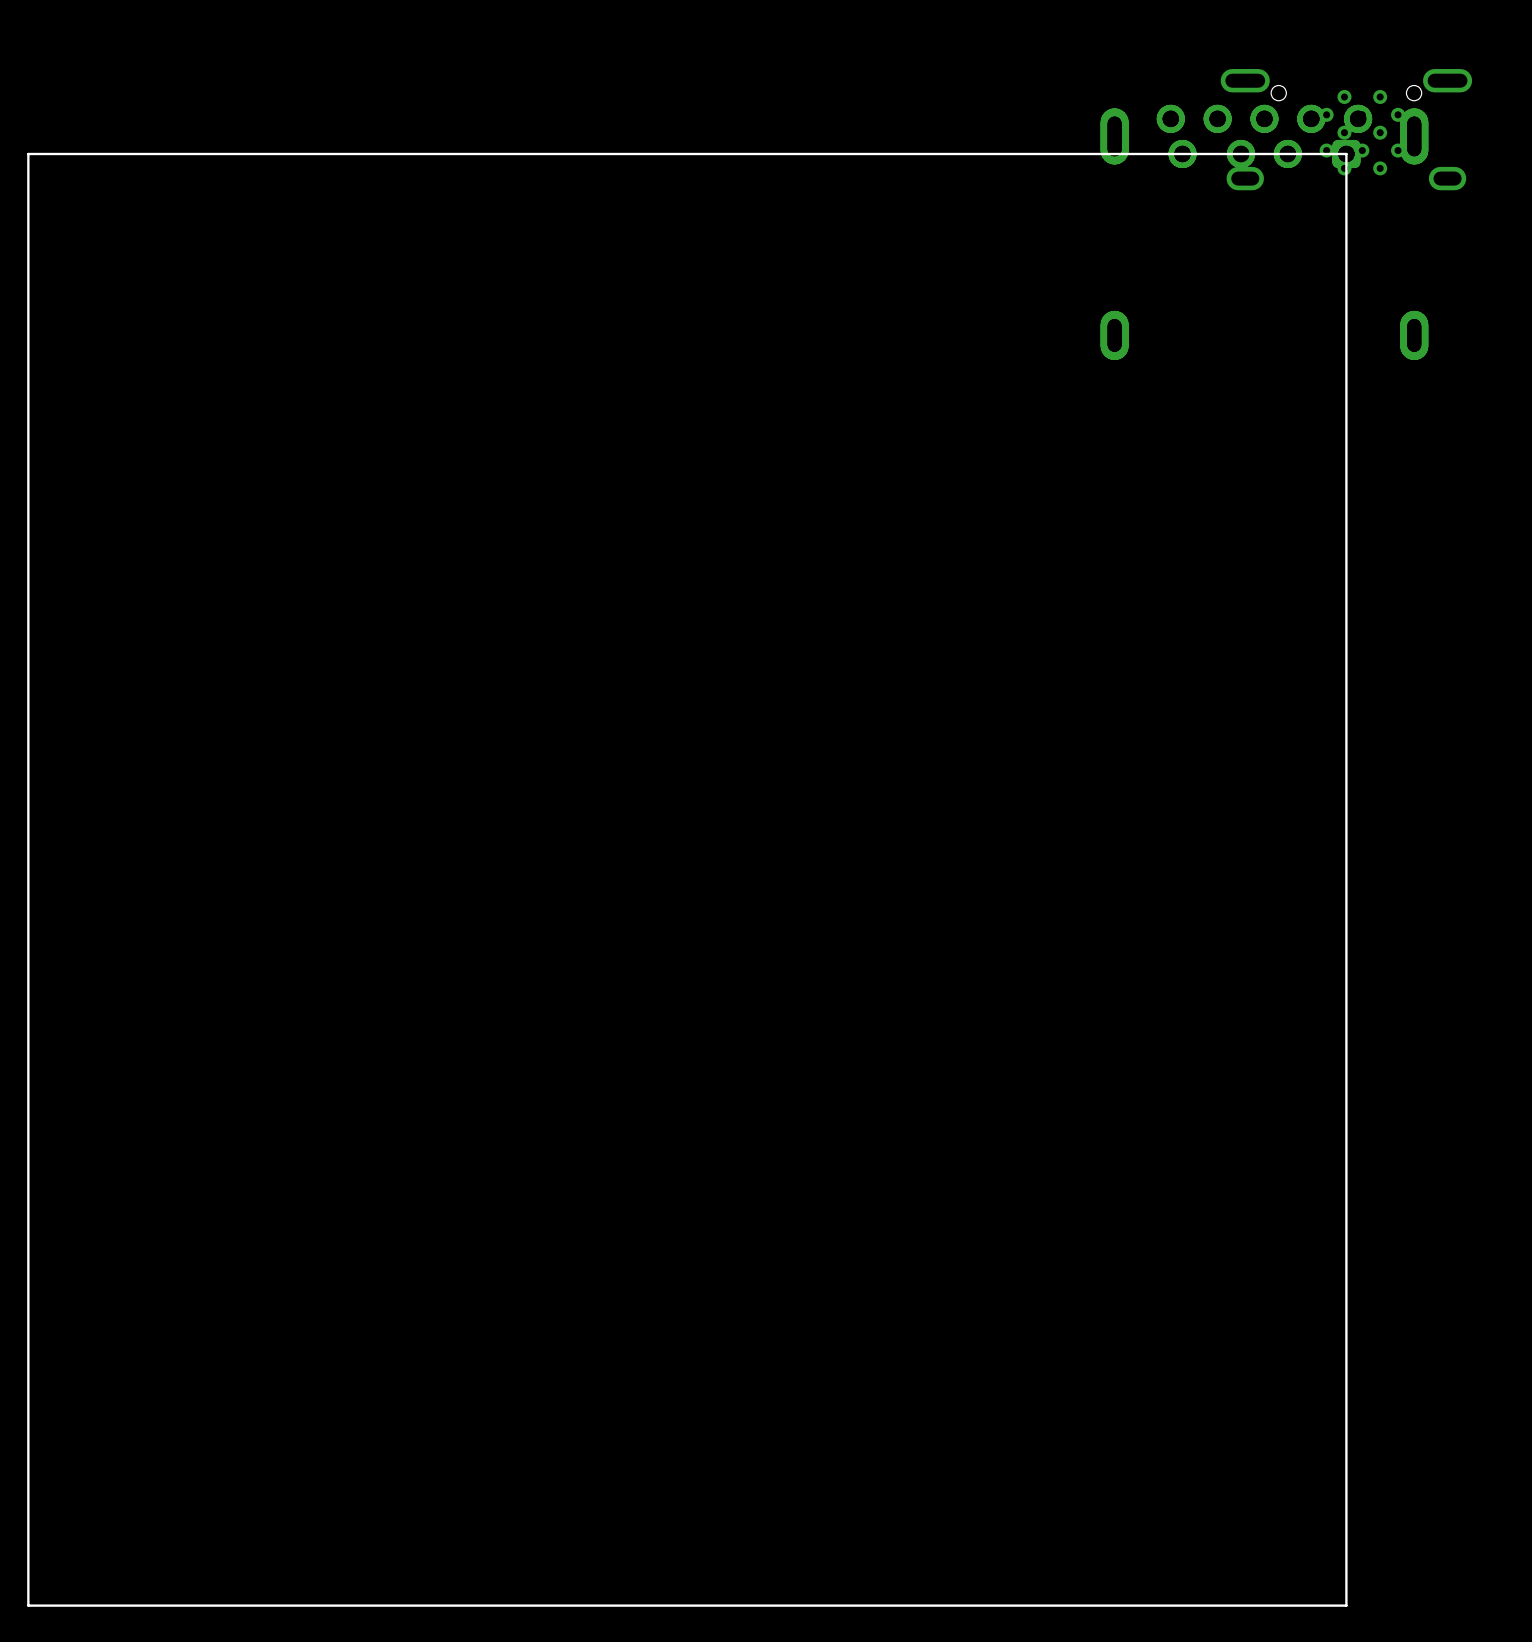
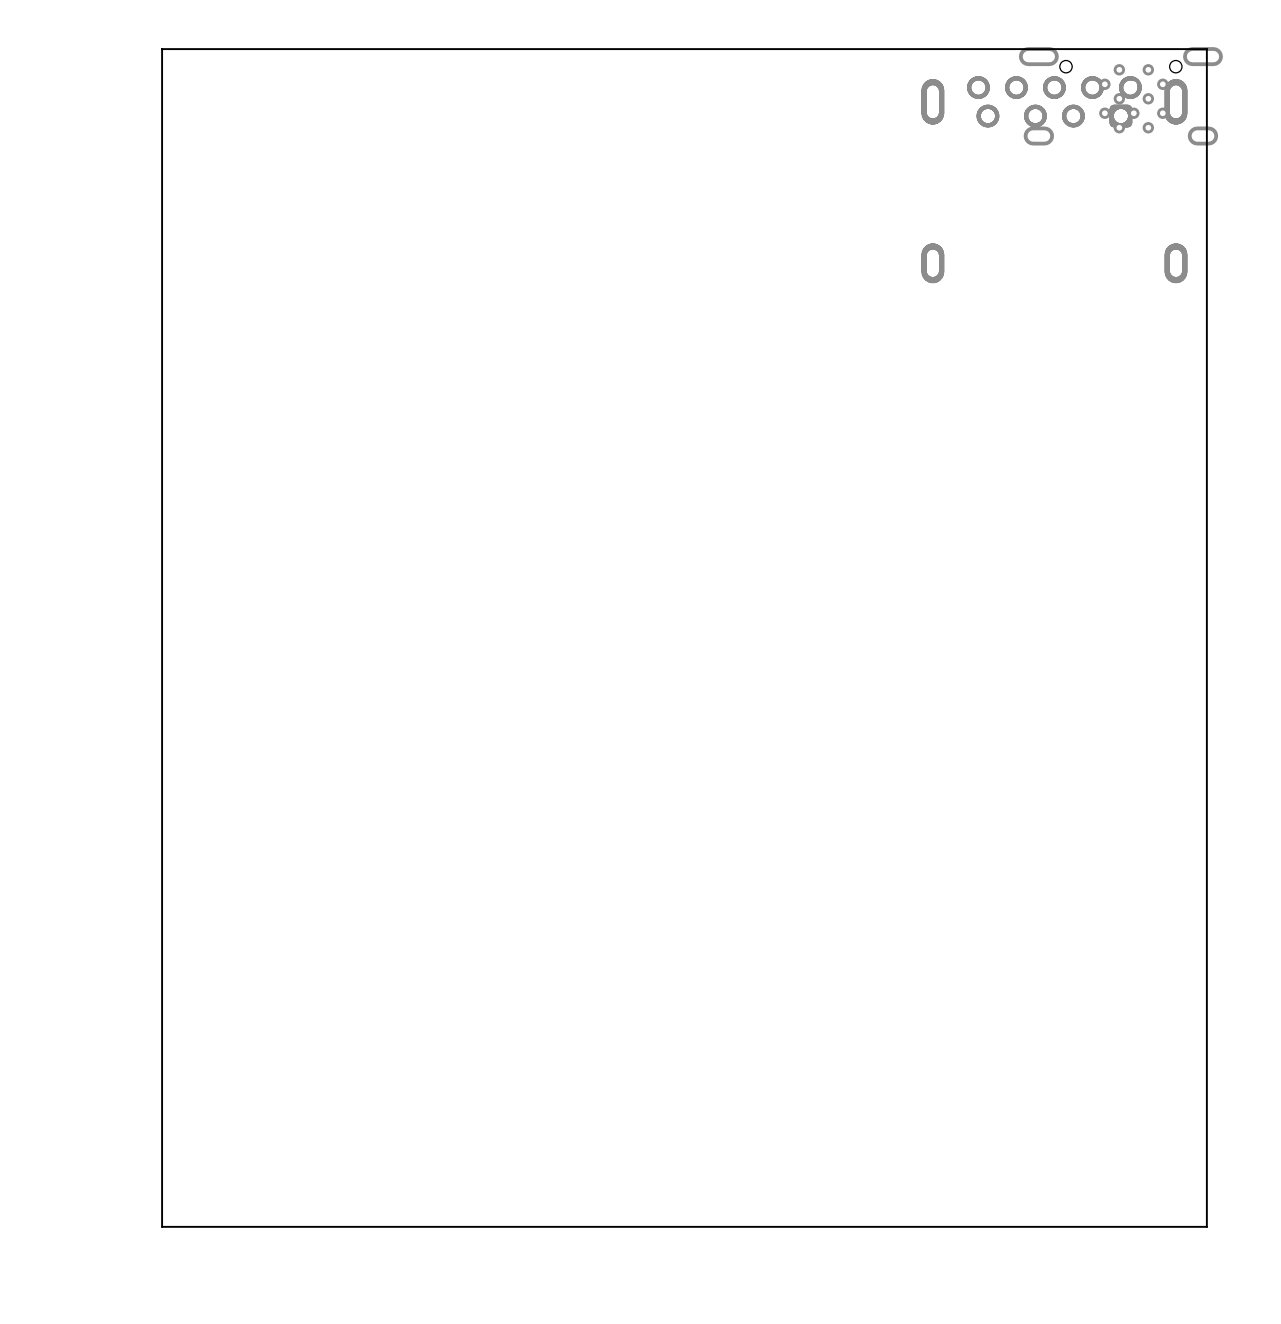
board edge: (1346, 153) (28, 153) (28, 1605) (1346, 1605) (1346, 153) -> (1206, 49) (1206, 1226) (162, 1226) (162, 49) (1206, 49)

